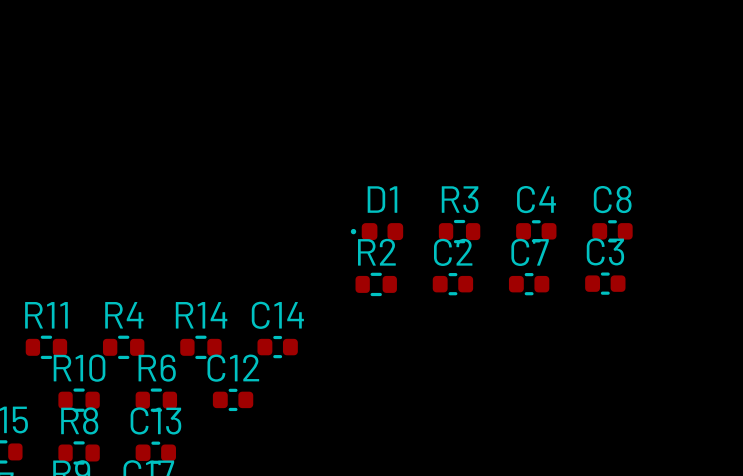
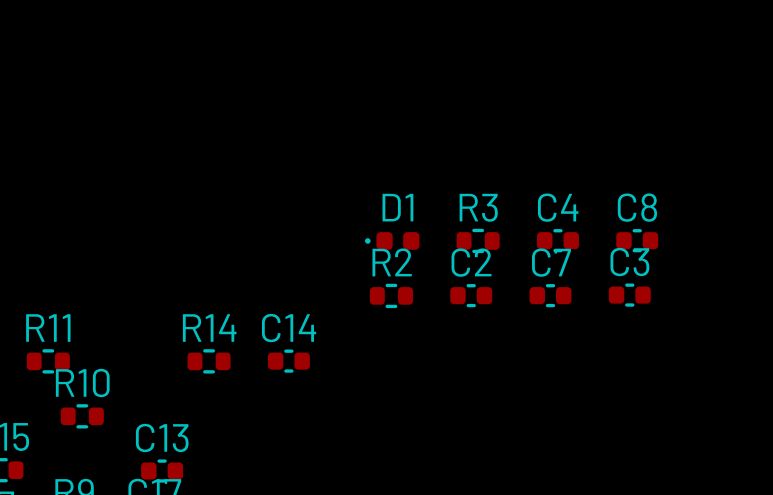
R4: (123, 347) -> none
C12: (233, 399) -> none
R6: (156, 400) -> none
R8: (79, 452) -> none

